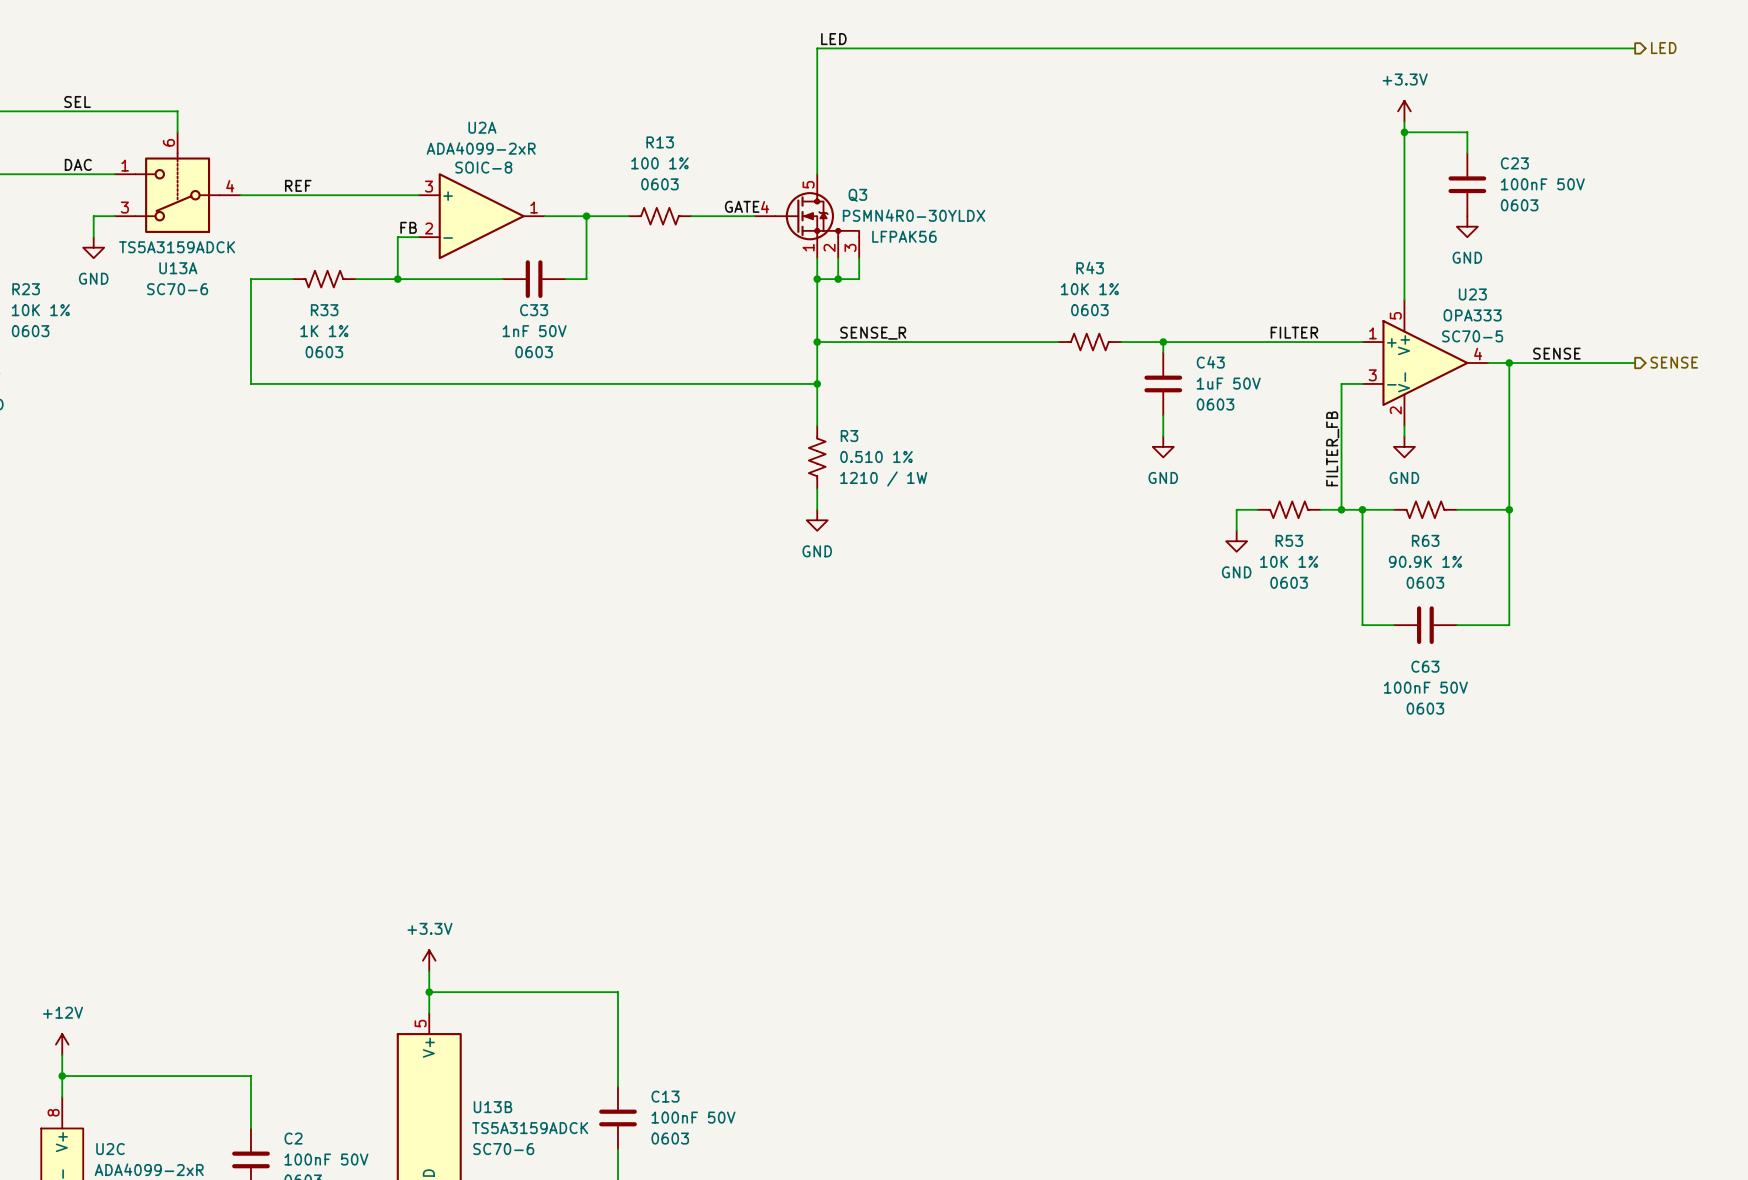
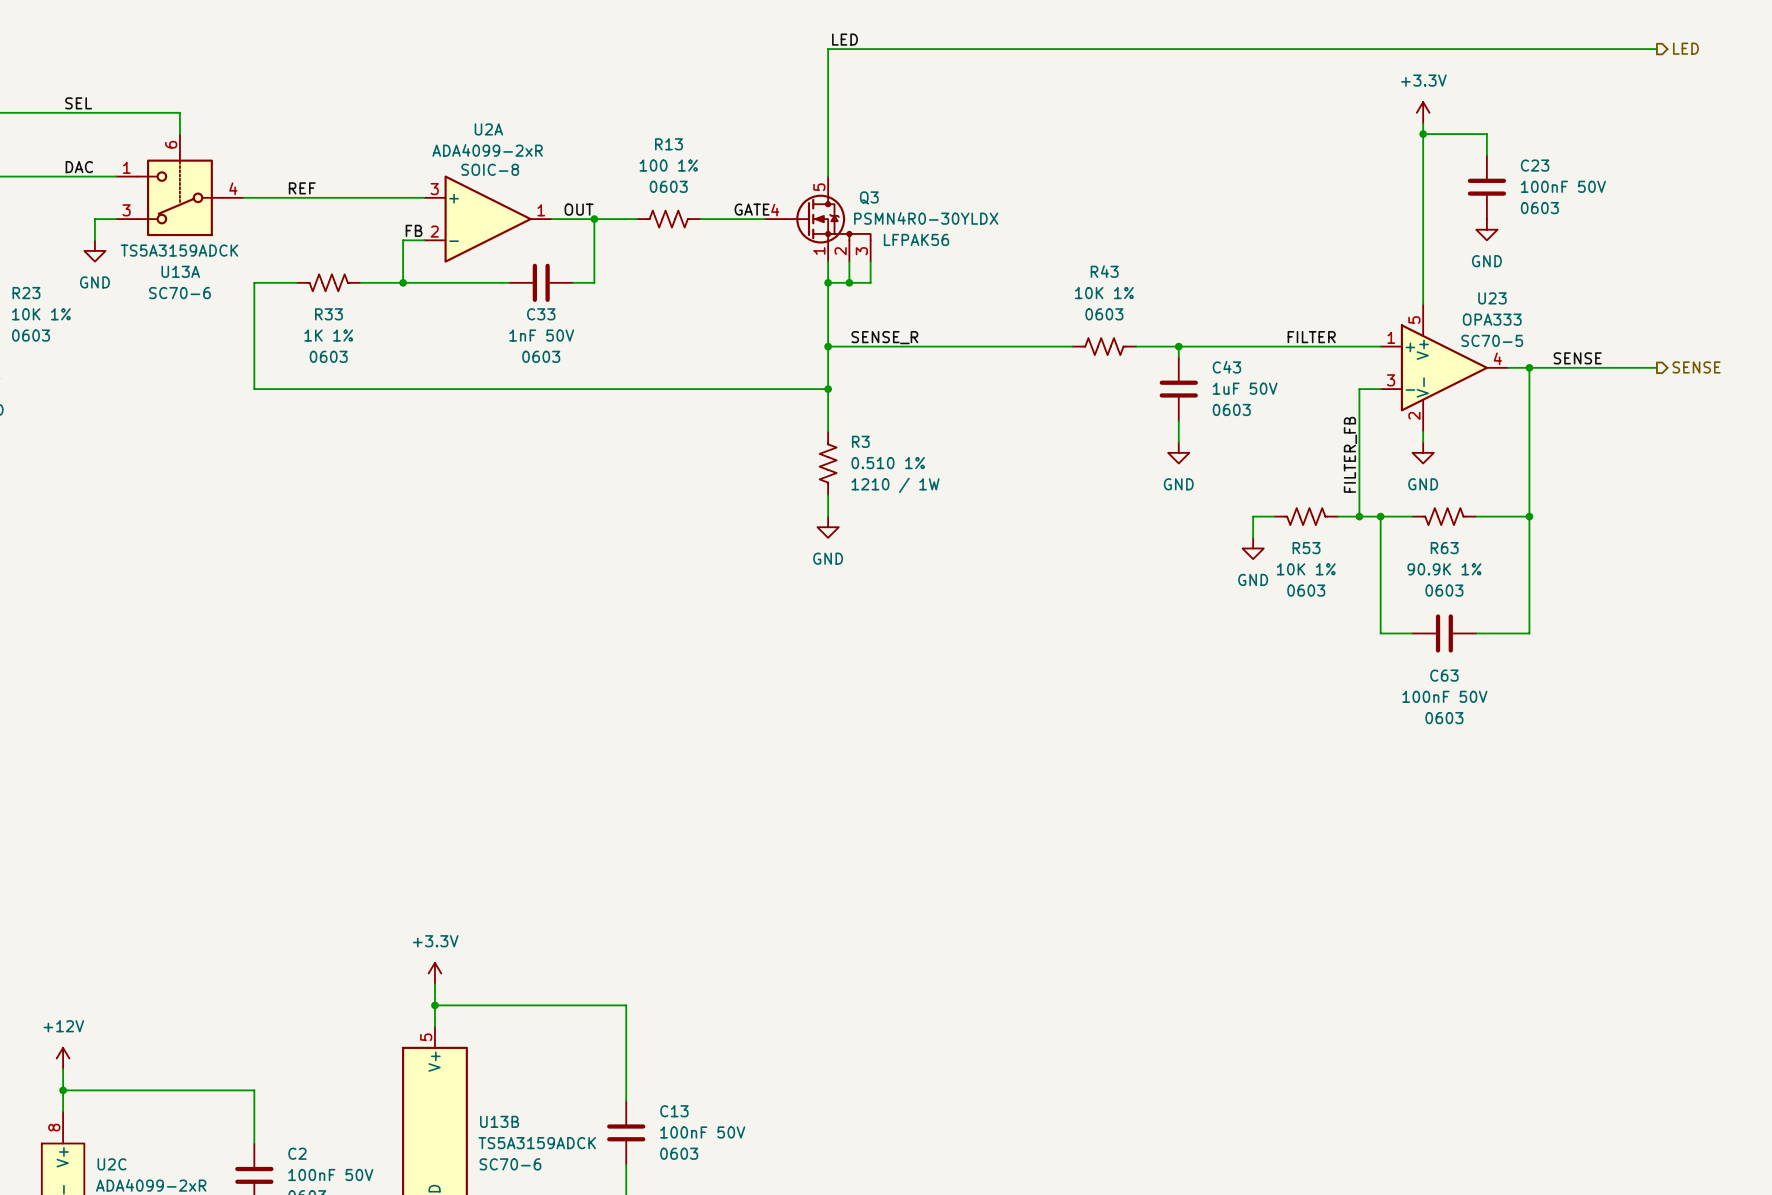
label: none -> OUT (579, 209)

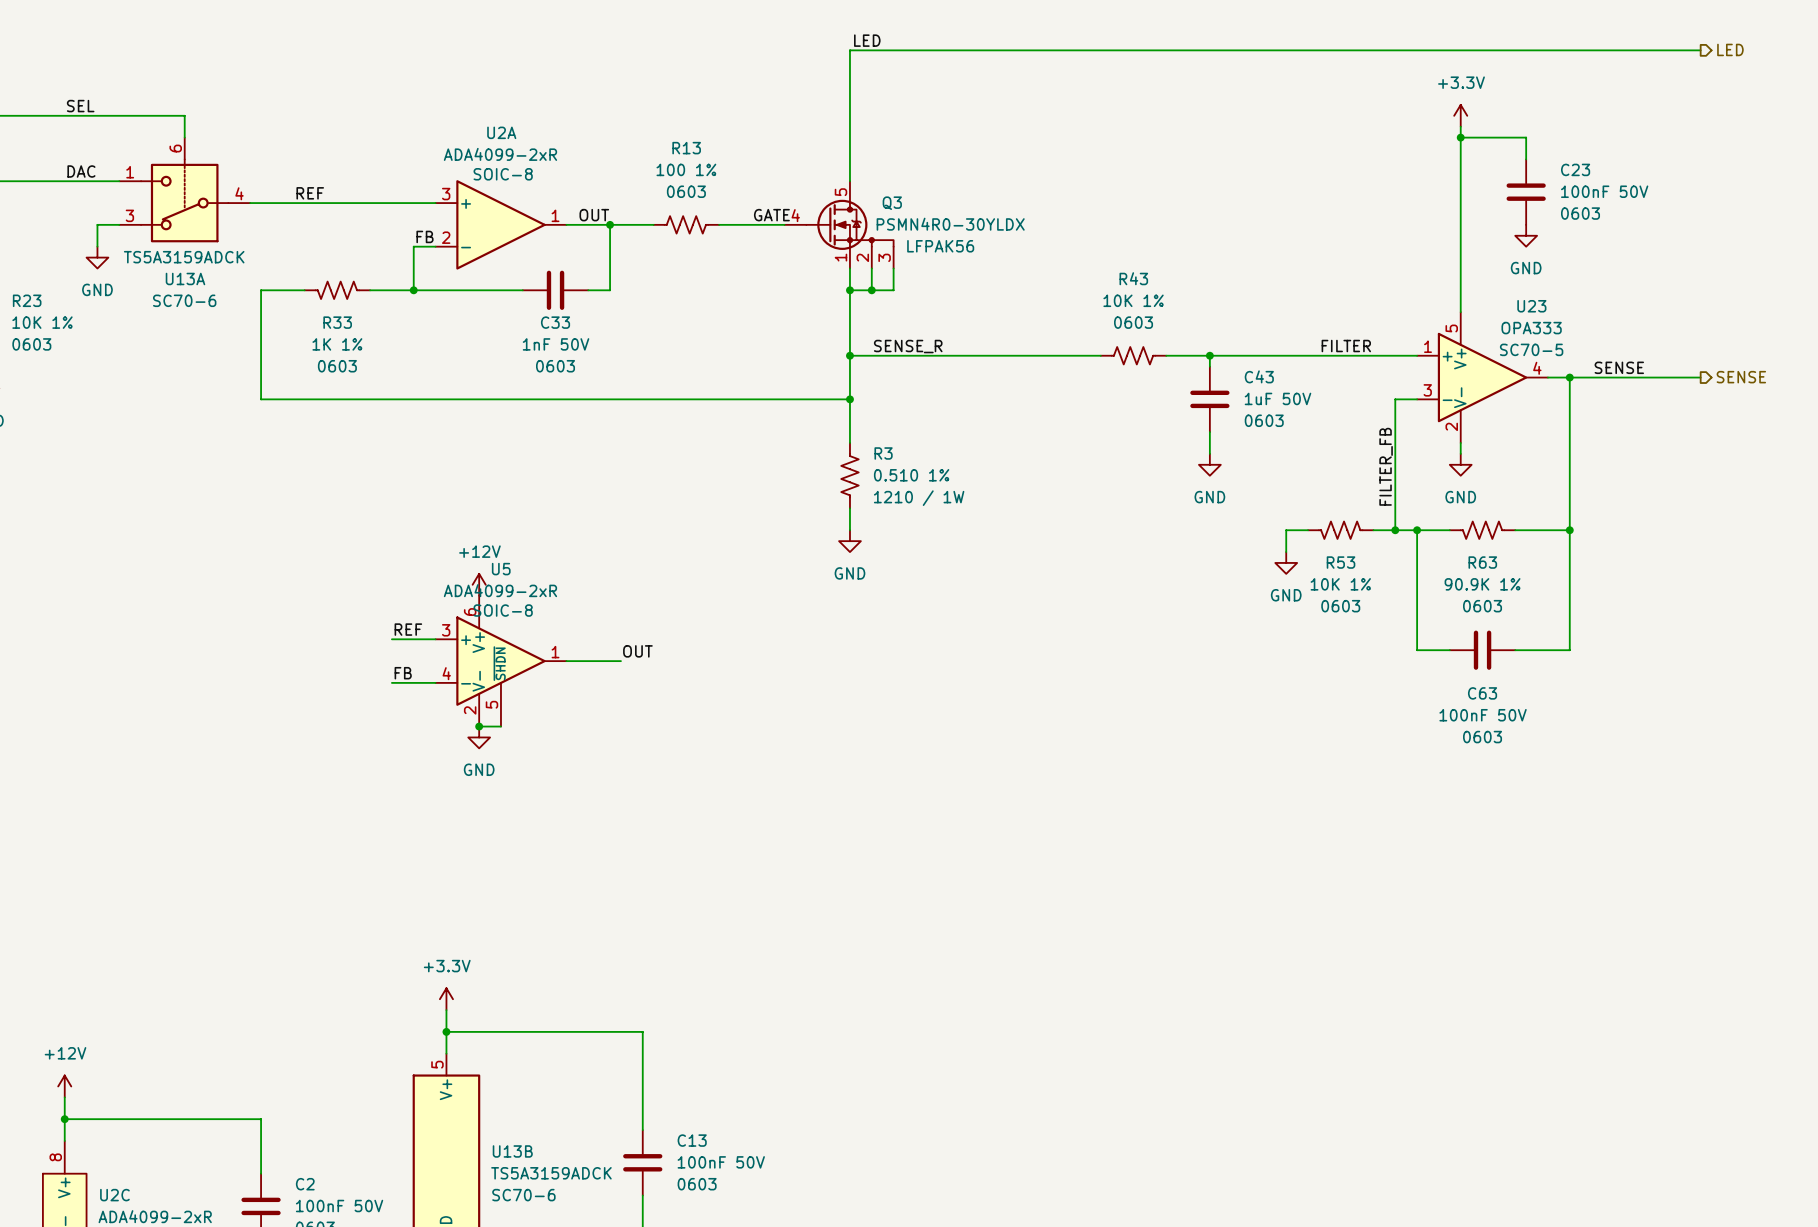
power symbol: none -> +12V (479, 584)
label: none -> REF (408, 629)
wire: none -> (391, 639) (435, 639)
label: none -> OUT (637, 651)
U5: none -> ADA4099-2xR (500, 661)
wire: none -> (566, 661) (620, 661)
label: none -> FB (403, 673)
wire: none -> (391, 682) (435, 682)
wire: none -> (479, 726) (500, 726)
junction: none -> (479, 726)
power symbol: none -> GND (479, 737)

